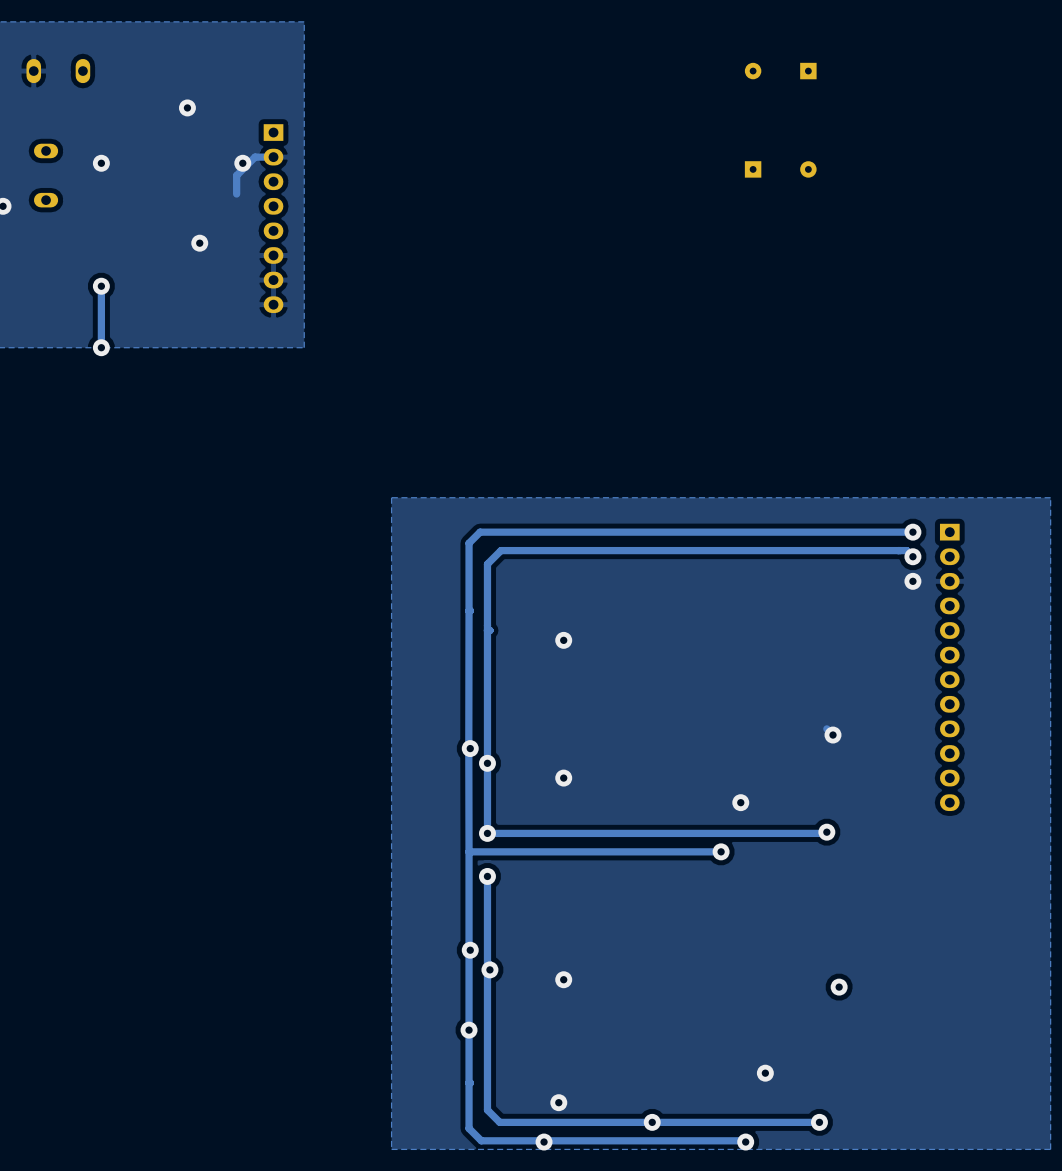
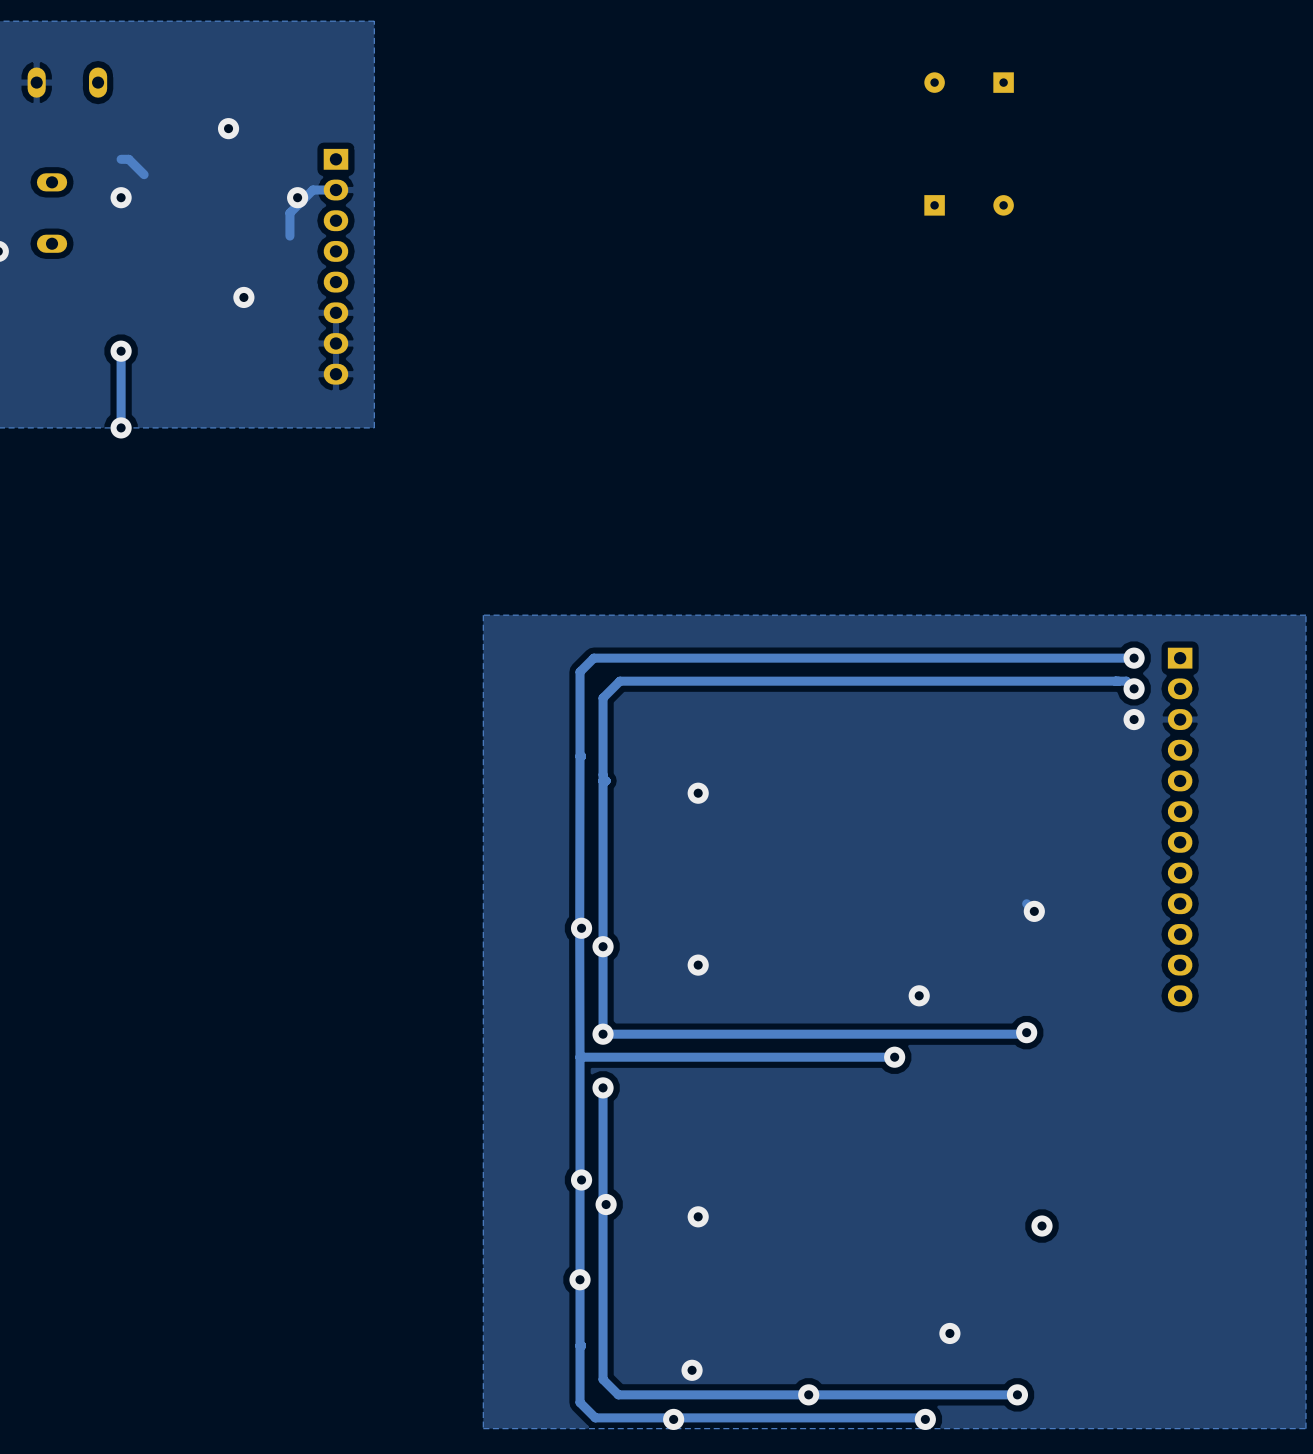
track: none -> (121, 159) (128, 159) (144, 174)

